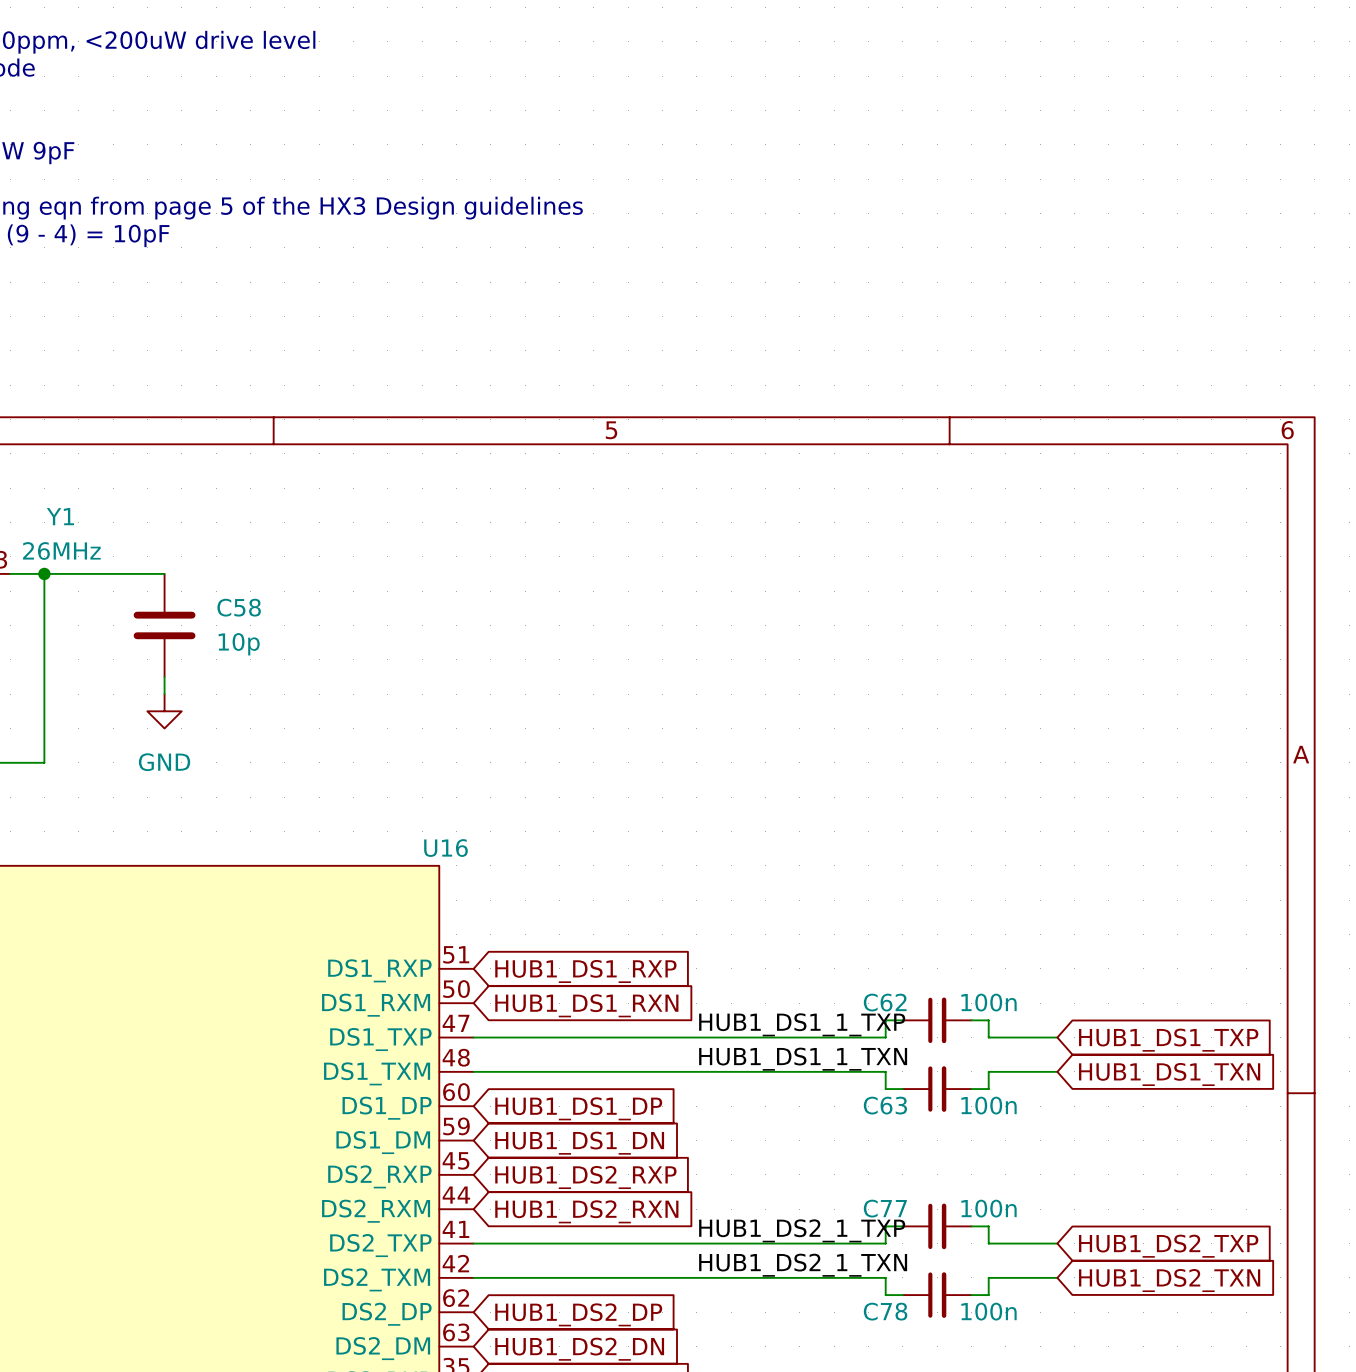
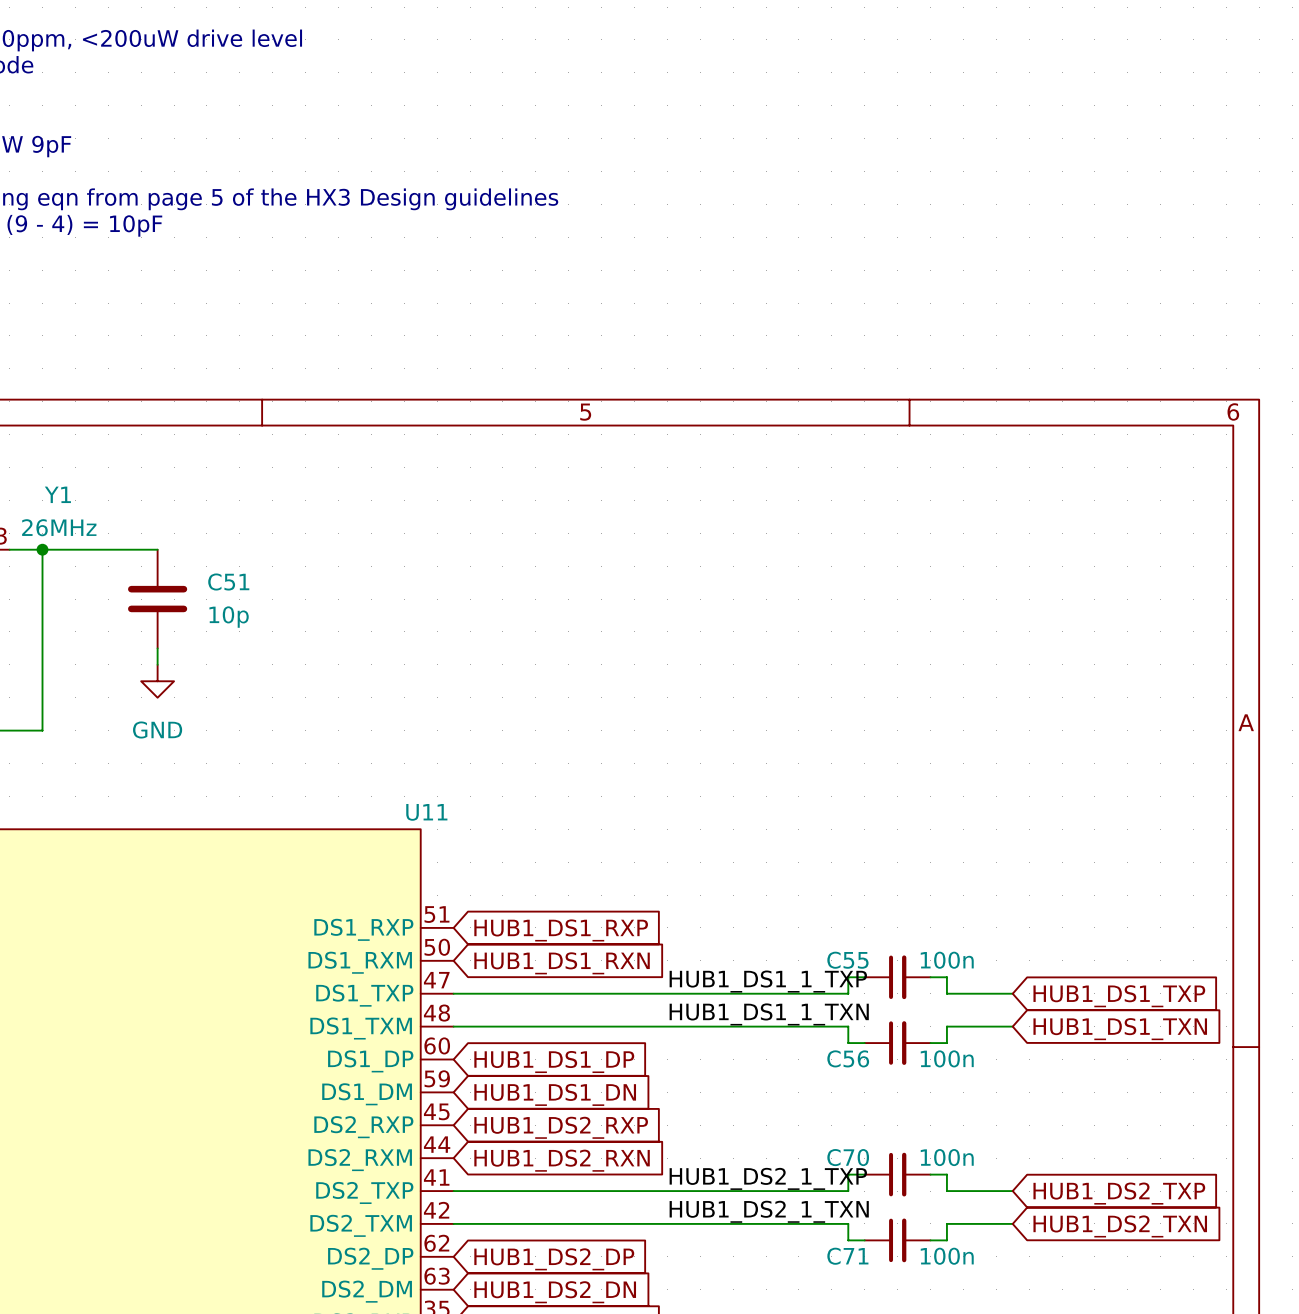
C58 name: C58 (239, 607) -> C51 (228, 582)
U16 name: U16 (445, 848) -> U11 (426, 812)
C62 name: C62 (885, 1002) -> C55 (847, 960)
C63 name: C63 (885, 1105) -> C56 (848, 1058)
C77 name: C77 (885, 1208) -> C70 (848, 1157)
C78 name: C78 (885, 1311) -> C71 (847, 1256)

